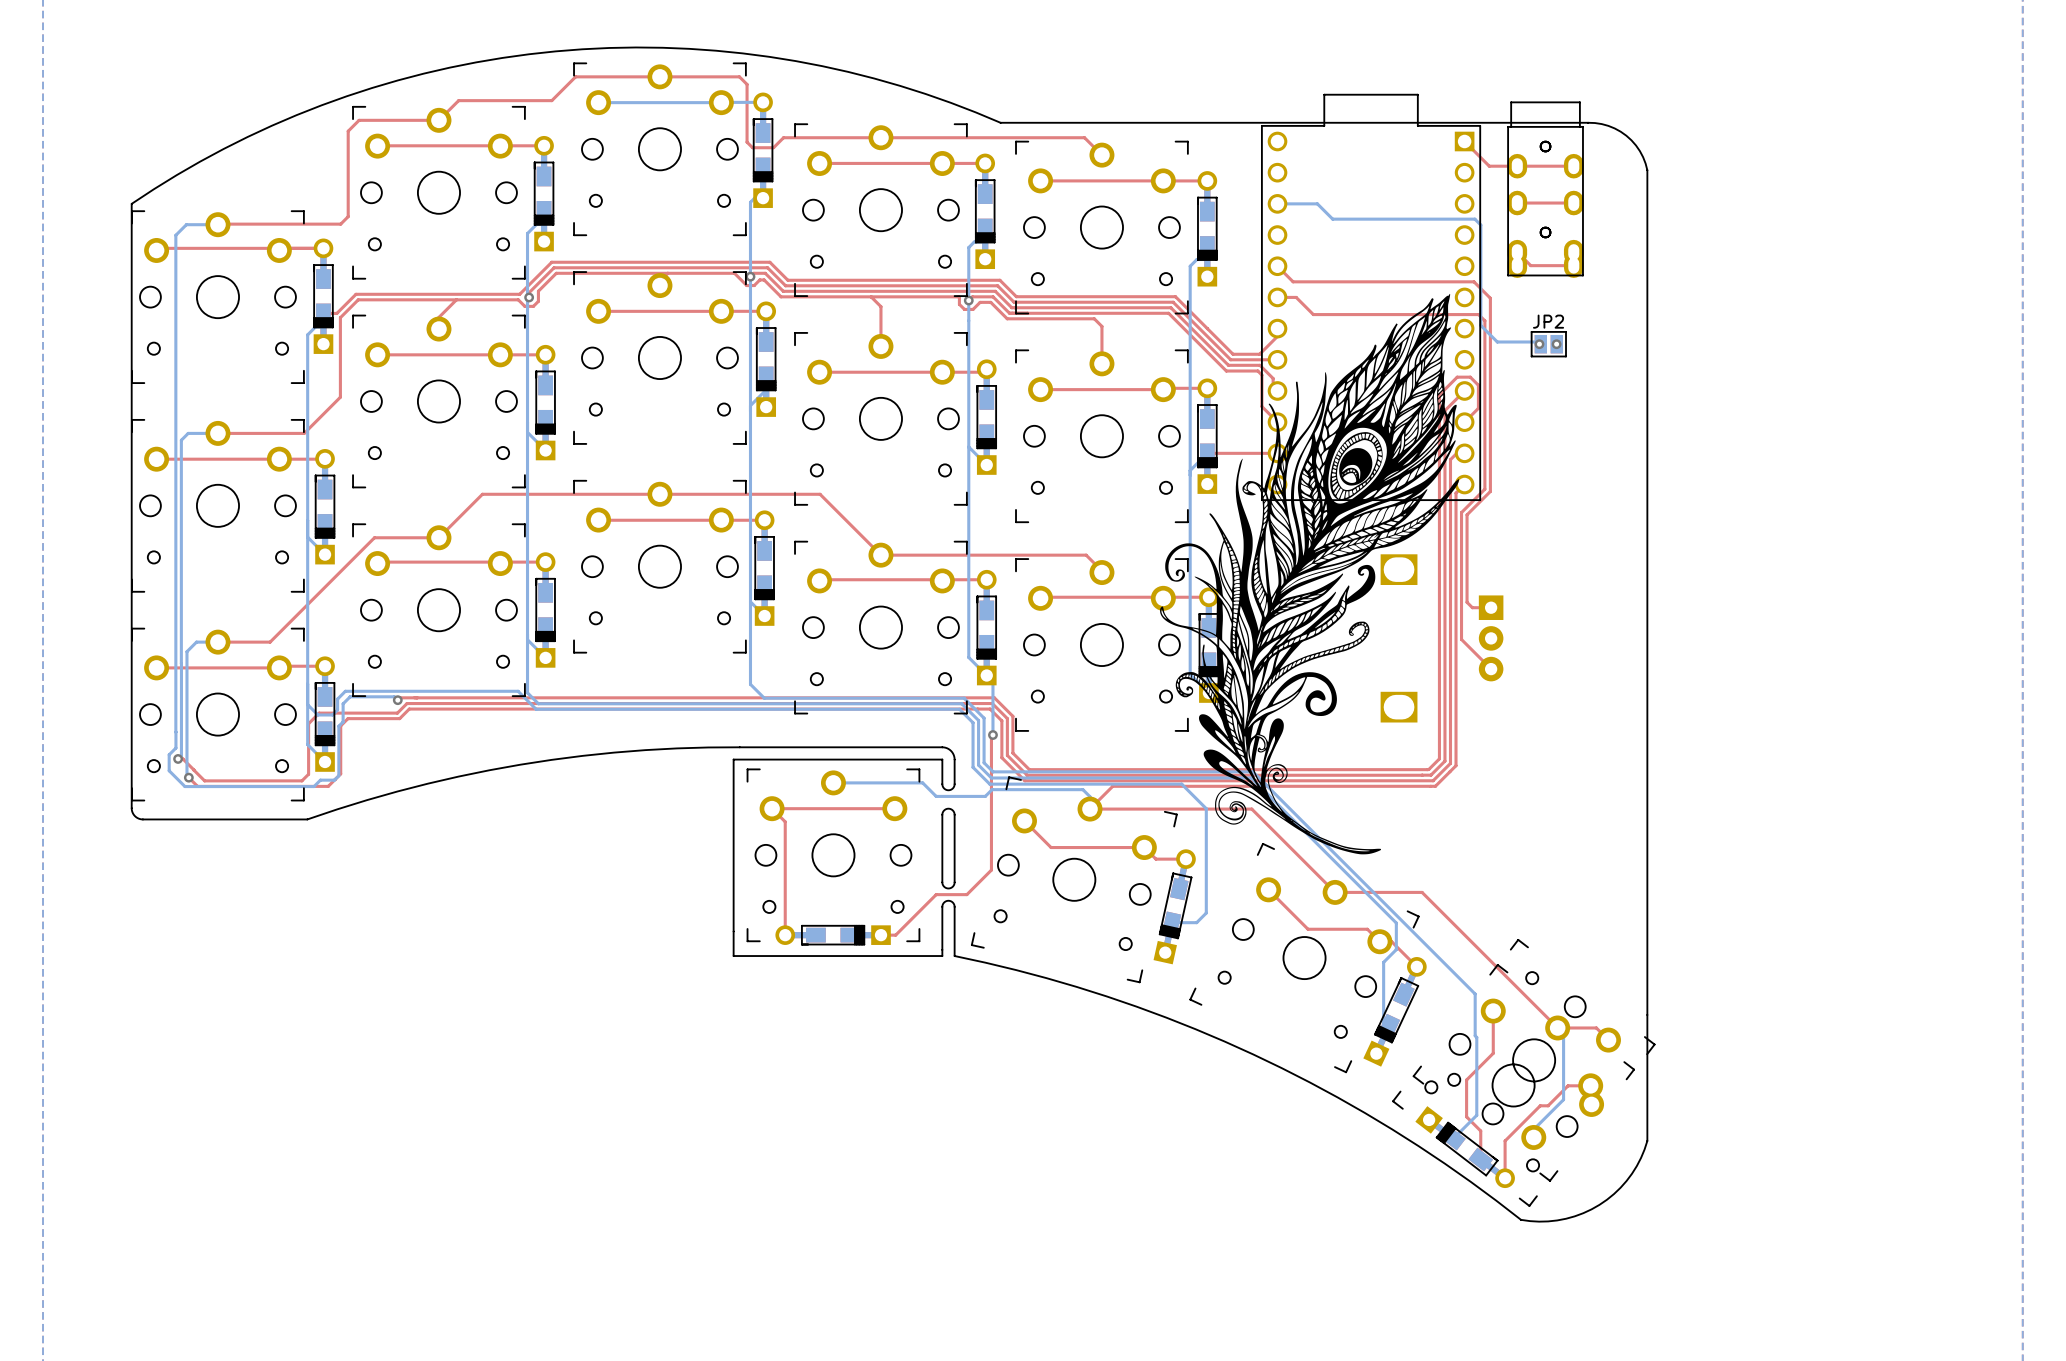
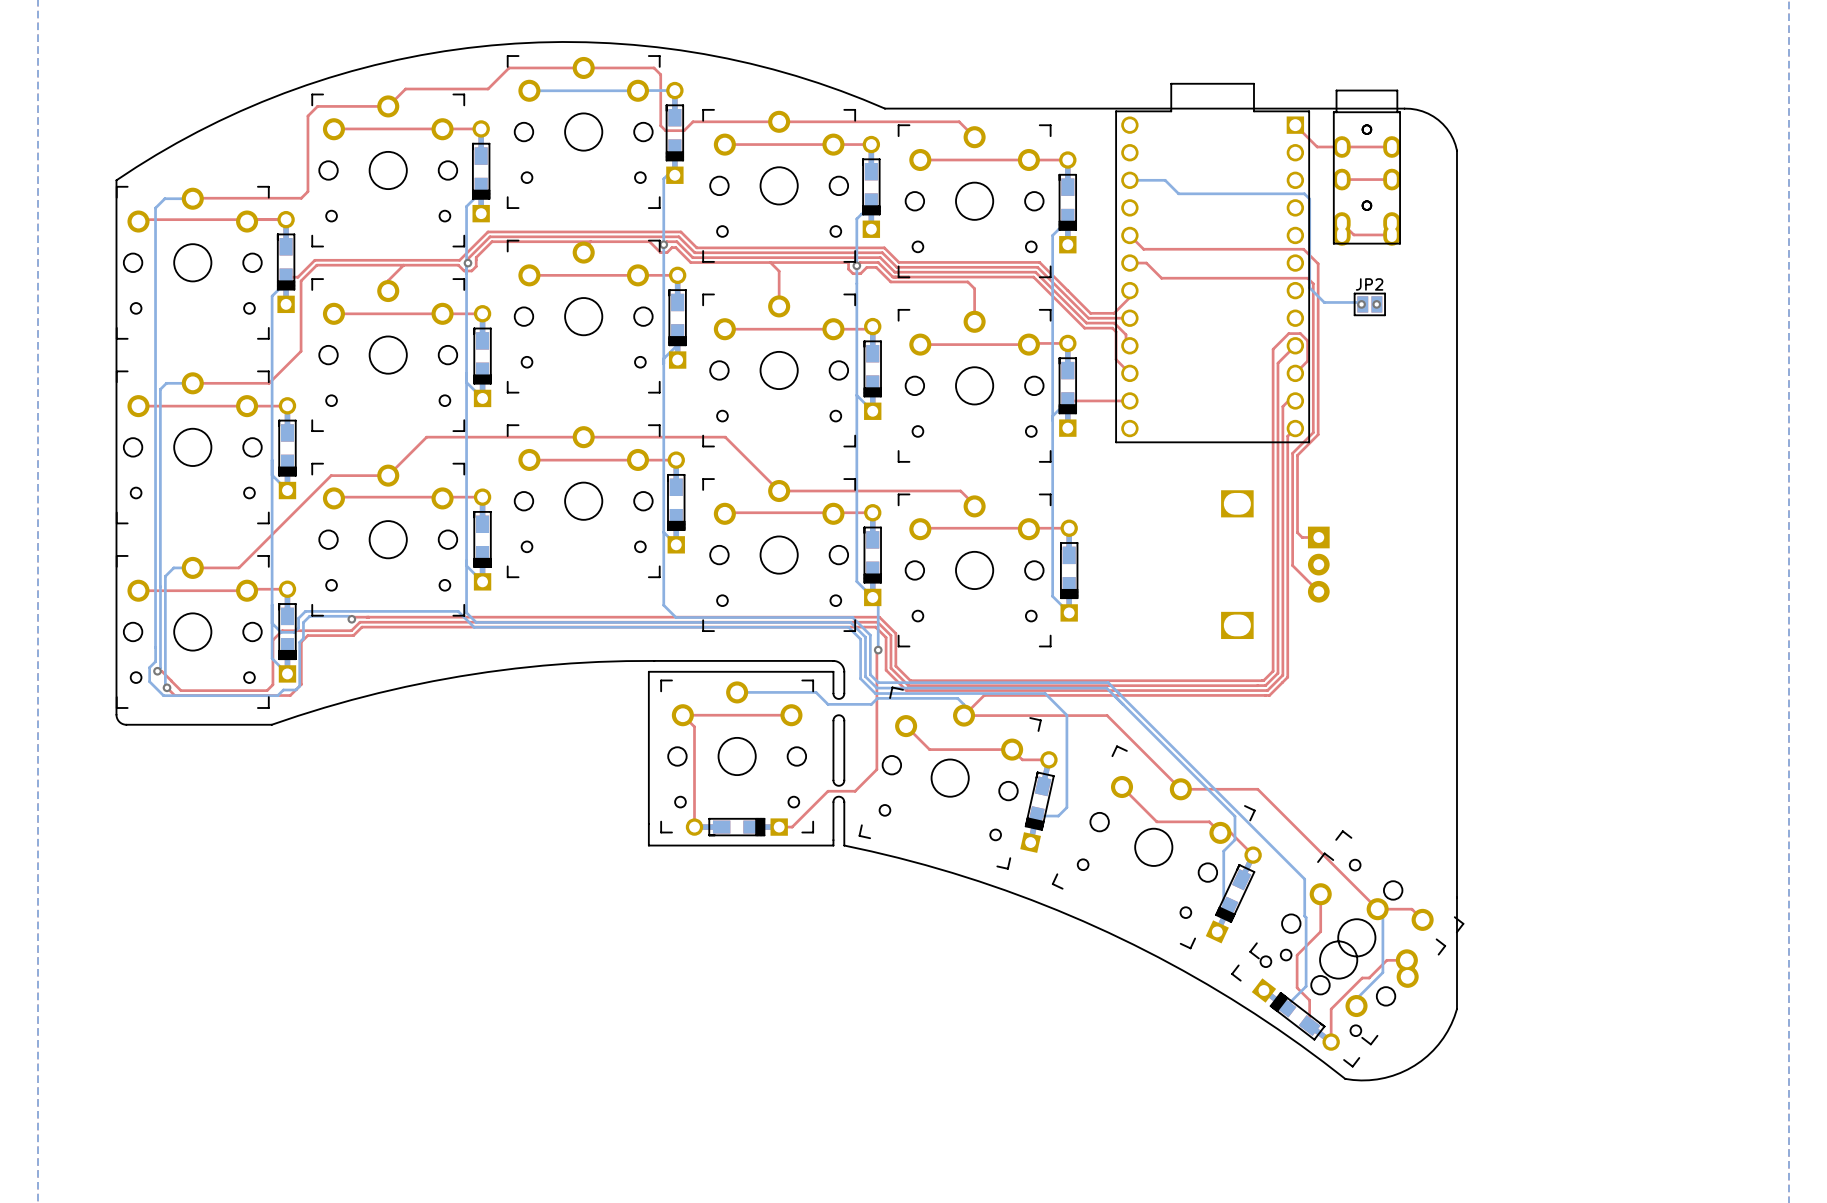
drawing: [1160, 293, 1460, 855] -> none

